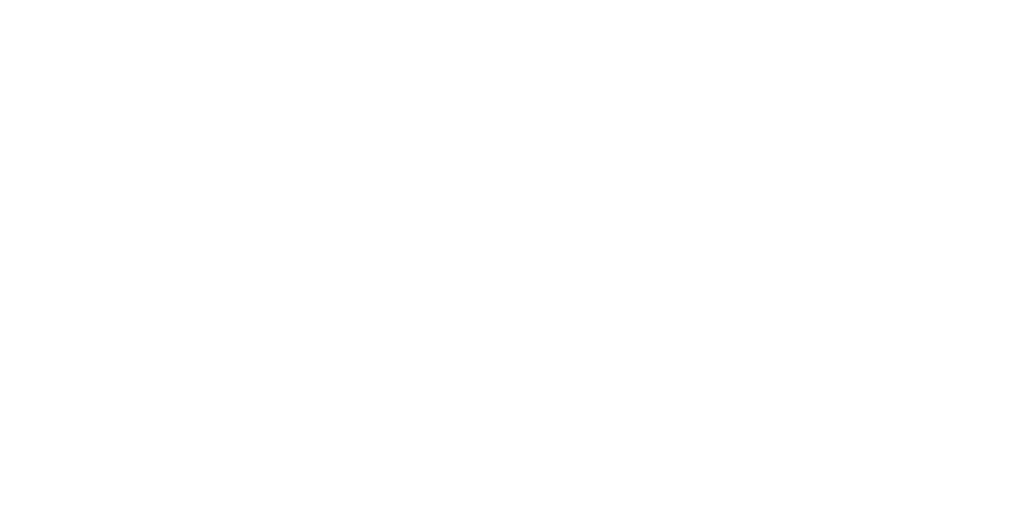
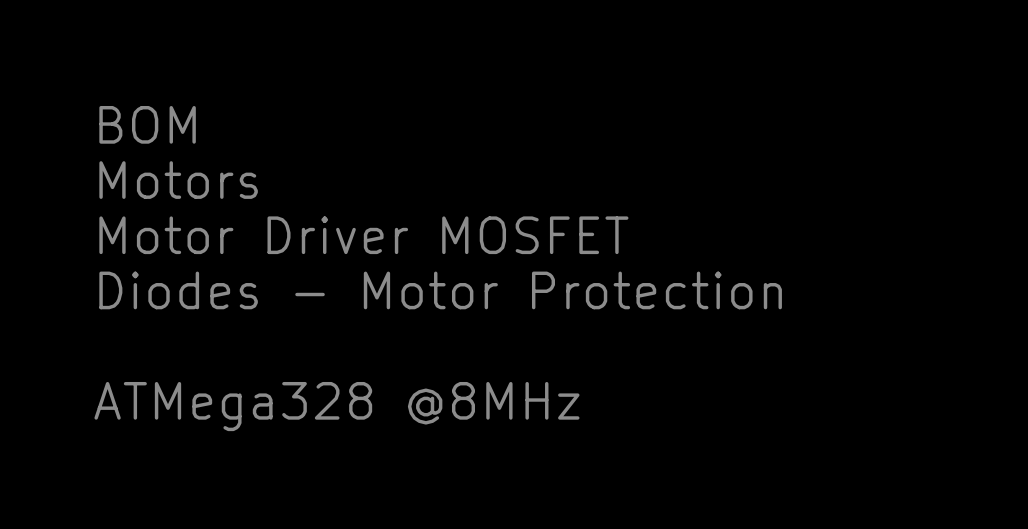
text: none -> BOM (147, 124)
text: none -> Motors (178, 180)
text: none -> Motor Driver MOSFET (363, 235)
text: none -> Diodes - Motor Protection (440, 290)
text: none -> ATMega328 @8MHz (336, 406)

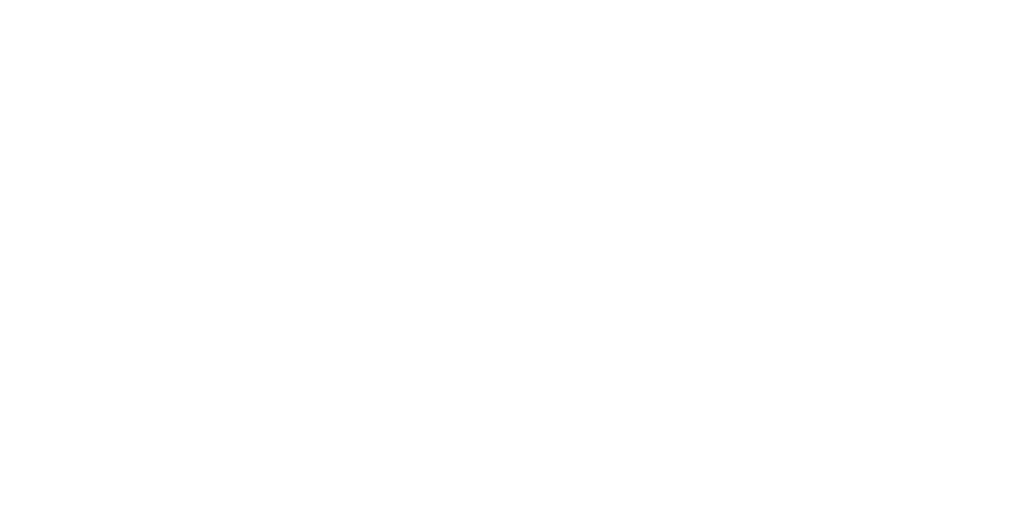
text: BOM (147, 124) -> none
text: Motors (178, 180) -> none
text: Motor Driver MOSFET (363, 235) -> none
text: Diodes - Motor Protection (440, 290) -> none
text: ATMega328 @8MHz (336, 406) -> none

